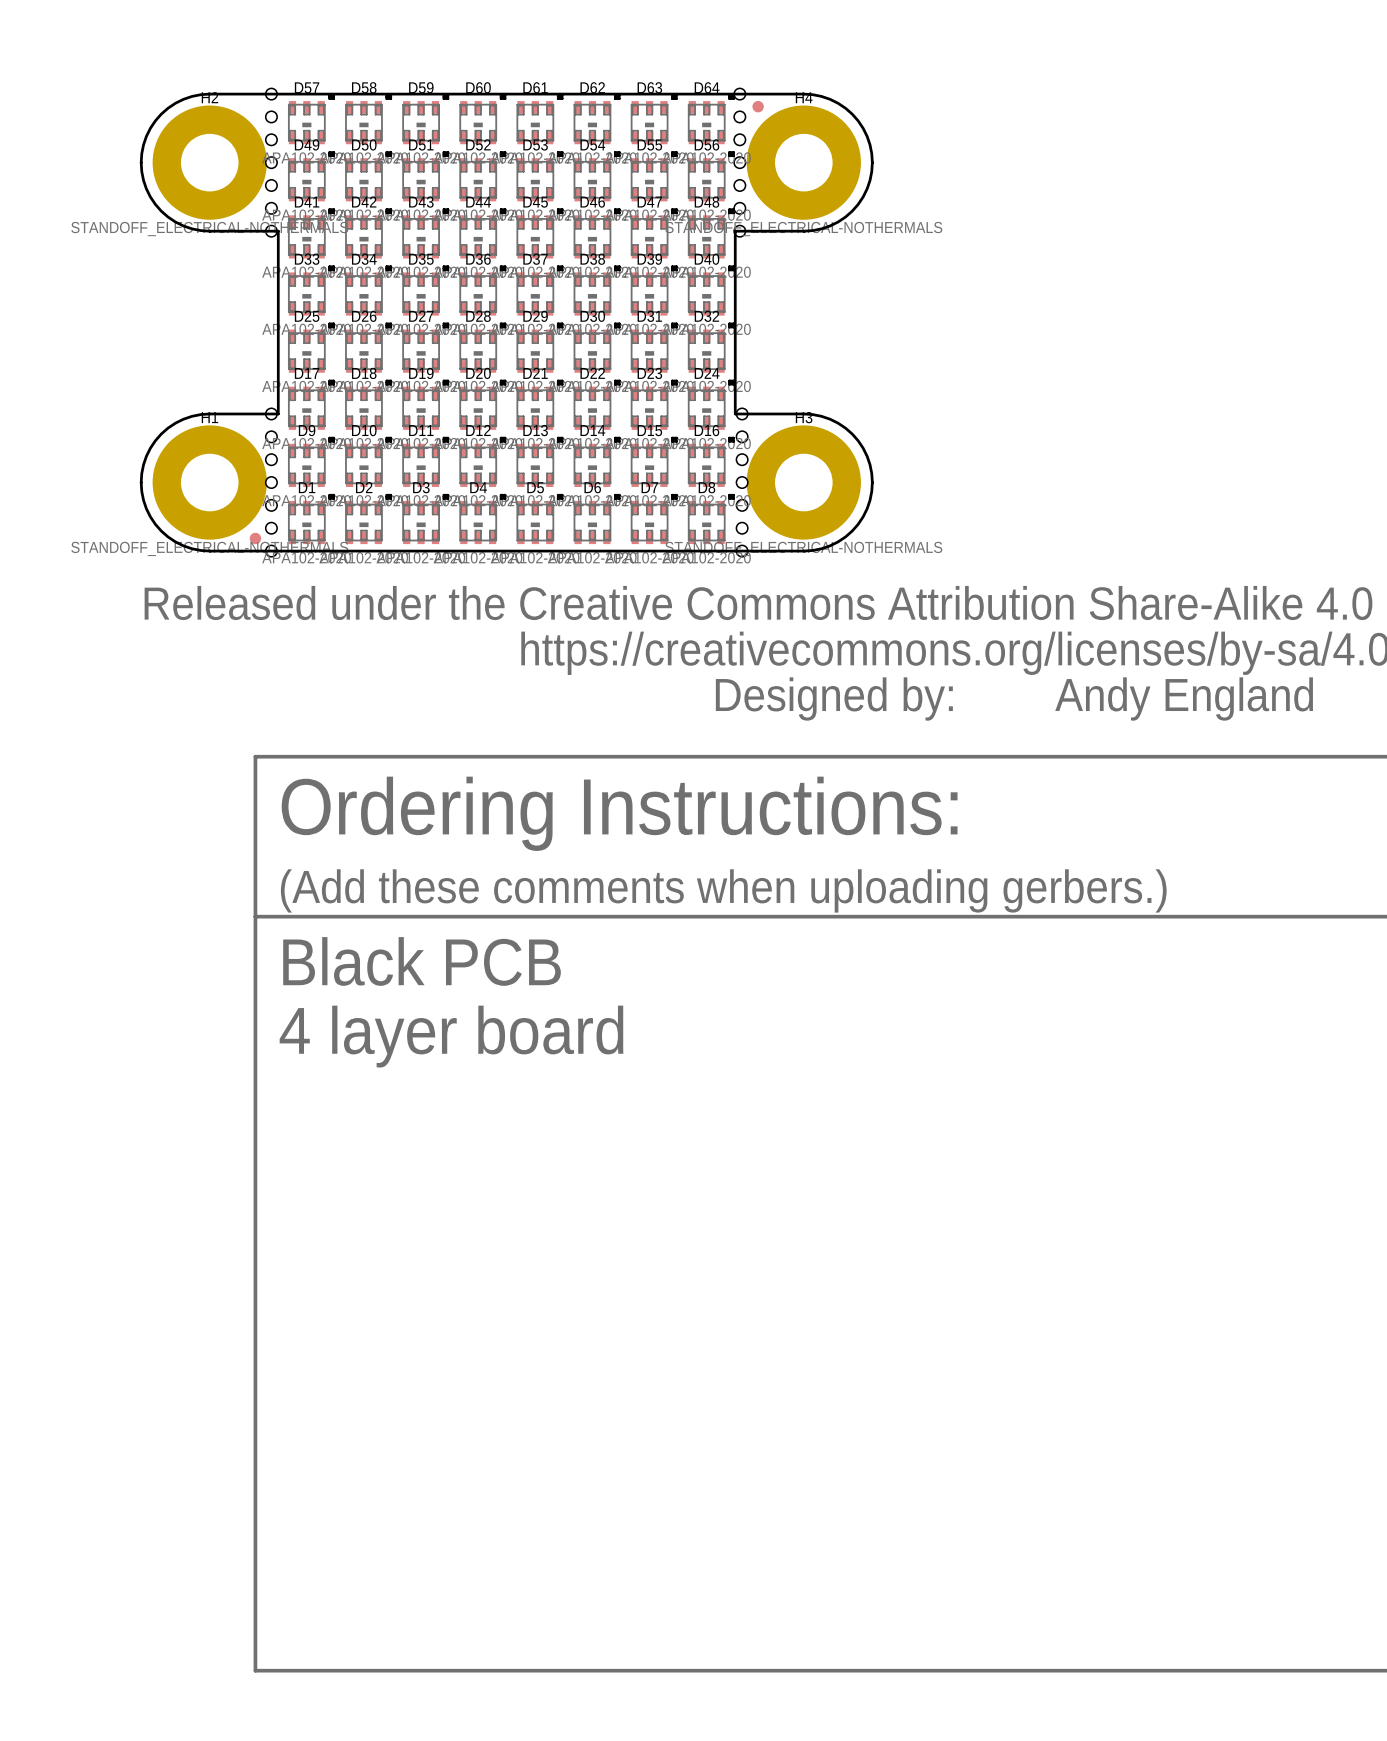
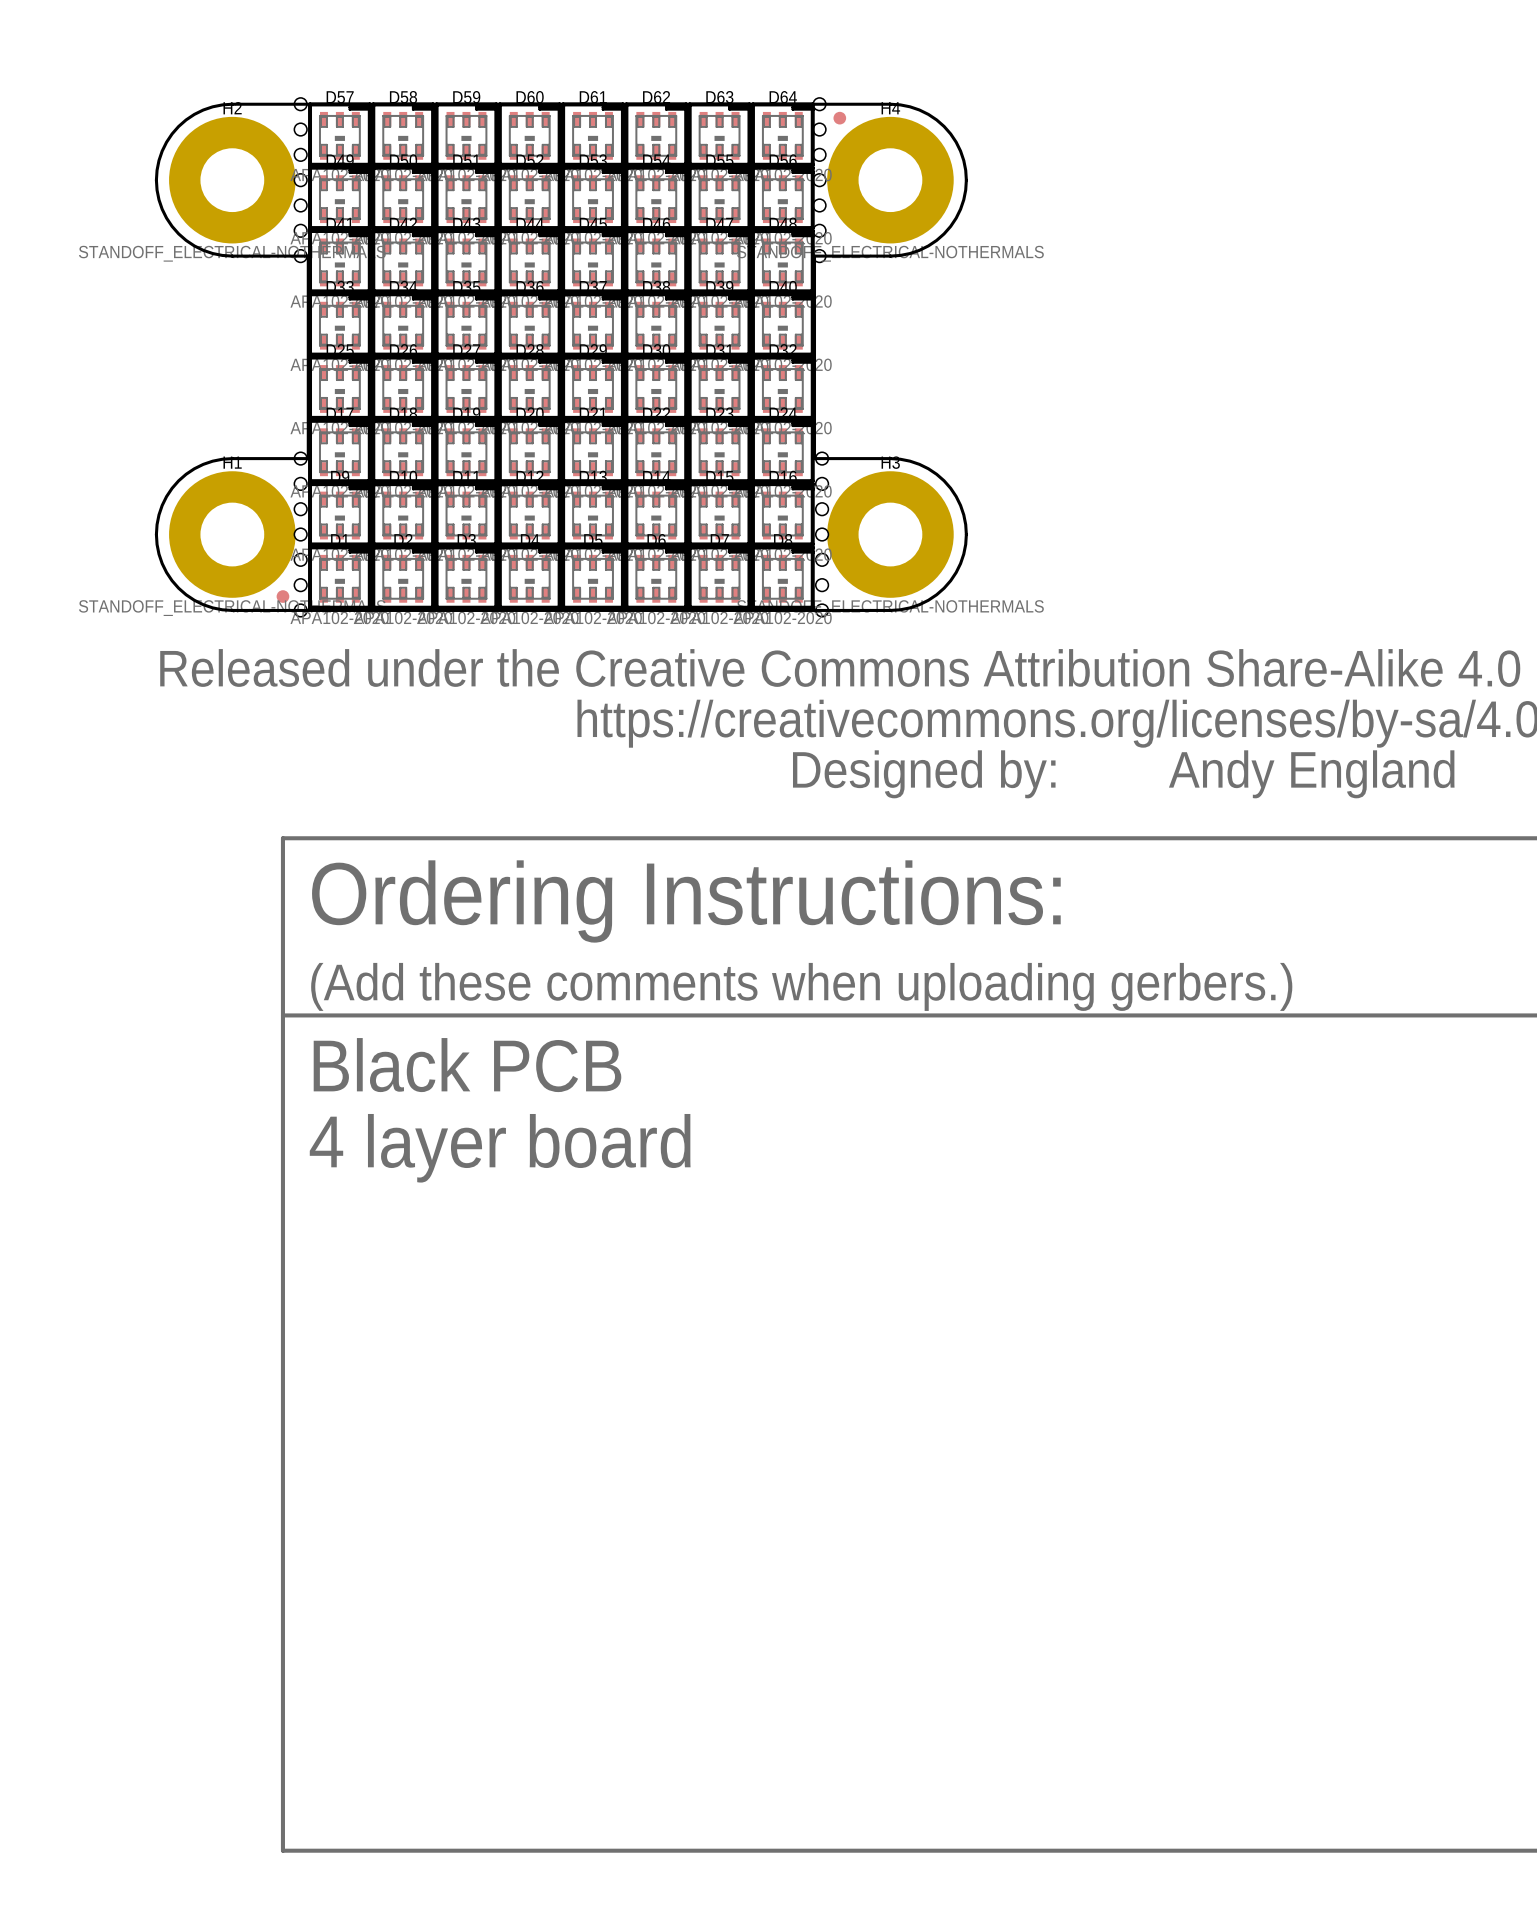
D57 footprint: [287, 94, 335, 145] -> [308, 102, 372, 167]
D58 footprint: [345, 94, 393, 145] -> [371, 102, 436, 167]
D59 footprint: [402, 94, 450, 145] -> [434, 102, 499, 167]
D60 footprint: [459, 94, 507, 145] -> [497, 102, 562, 167]
D61 footprint: [516, 94, 564, 145] -> [561, 102, 625, 167]
D62 footprint: [573, 94, 621, 145] -> [624, 102, 689, 167]
D63 footprint: [630, 94, 678, 145] -> [687, 102, 752, 167]
D64 footprint: [687, 94, 735, 145] -> [750, 102, 815, 167]
D49 footprint: [287, 151, 335, 202] -> [308, 165, 372, 231]
D50 footprint: [345, 151, 393, 202] -> [371, 165, 436, 231]
D51 footprint: [402, 151, 450, 202] -> [434, 165, 499, 231]
D52 footprint: [459, 151, 507, 202] -> [497, 165, 562, 231]
D53 footprint: [516, 151, 564, 202] -> [561, 165, 625, 231]
D54 footprint: [573, 151, 621, 202] -> [624, 165, 689, 231]
D55 footprint: [630, 151, 678, 202] -> [687, 165, 752, 231]
D56 footprint: [687, 151, 735, 202] -> [750, 165, 815, 231]
D41 footprint: [287, 208, 335, 259] -> [308, 229, 372, 294]
D42 footprint: [345, 208, 393, 259] -> [371, 229, 436, 294]
D43 footprint: [402, 208, 450, 259] -> [434, 229, 499, 294]
D44 footprint: [459, 208, 507, 259] -> [497, 229, 562, 294]
D45 footprint: [516, 208, 564, 259] -> [561, 229, 625, 294]
D46 footprint: [573, 208, 621, 259] -> [624, 229, 689, 294]
D47 footprint: [630, 208, 678, 259] -> [687, 229, 752, 294]
D48 footprint: [687, 208, 735, 259] -> [750, 229, 815, 294]
D33 footprint: [287, 265, 335, 316] -> [308, 292, 372, 357]
D34 footprint: [345, 265, 393, 316] -> [371, 292, 436, 357]
D35 footprint: [402, 265, 450, 316] -> [434, 292, 499, 357]
D36 footprint: [459, 265, 507, 316] -> [497, 292, 562, 357]
D37 footprint: [516, 265, 564, 316] -> [561, 292, 625, 357]
D38 footprint: [573, 265, 621, 316] -> [624, 292, 689, 357]
D39 footprint: [630, 265, 678, 316] -> [687, 292, 752, 357]
D40 footprint: [687, 265, 735, 316] -> [750, 292, 815, 357]
D25 footprint: [287, 322, 335, 373] -> [308, 355, 372, 420]
D26 footprint: [345, 322, 393, 373] -> [371, 355, 436, 420]
D27 footprint: [402, 322, 450, 373] -> [434, 355, 499, 420]
D28 footprint: [459, 322, 507, 373] -> [497, 355, 562, 420]
D29 footprint: [516, 322, 564, 373] -> [561, 355, 625, 420]
D30 footprint: [573, 322, 621, 373] -> [624, 355, 689, 420]
D31 footprint: [630, 322, 678, 373] -> [687, 355, 752, 420]
D32 footprint: [687, 322, 735, 373] -> [750, 355, 815, 420]
D17 footprint: [287, 379, 335, 430] -> [308, 418, 372, 484]
D18 footprint: [345, 379, 393, 430] -> [371, 418, 436, 484]
D19 footprint: [402, 379, 450, 430] -> [434, 418, 499, 484]
D20 footprint: [459, 379, 507, 430] -> [497, 418, 562, 484]
D21 footprint: [516, 379, 564, 430] -> [561, 418, 625, 484]
D22 footprint: [573, 379, 621, 430] -> [624, 418, 689, 484]
D23 footprint: [630, 379, 678, 430] -> [687, 418, 752, 484]
D24 footprint: [687, 379, 735, 430] -> [750, 418, 815, 484]
D9 footprint: [287, 436, 335, 487] -> [308, 482, 372, 547]
D10 footprint: [345, 436, 393, 487] -> [371, 482, 436, 547]
D11 footprint: [402, 436, 450, 487] -> [434, 482, 499, 547]
D12 footprint: [459, 436, 507, 487] -> [497, 482, 562, 547]
D13 footprint: [516, 436, 564, 487] -> [561, 482, 625, 547]
D14 footprint: [573, 436, 621, 487] -> [624, 482, 689, 547]
D15 footprint: [630, 436, 678, 487] -> [687, 482, 752, 547]
D16 footprint: [687, 436, 735, 487] -> [750, 482, 815, 547]
D1 footprint: [287, 493, 335, 545] -> [308, 545, 372, 610]
D2 footprint: [345, 493, 393, 545] -> [371, 545, 436, 610]
D3 footprint: [402, 493, 450, 545] -> [434, 545, 499, 610]
D4 footprint: [459, 493, 507, 545] -> [497, 545, 562, 610]
D5 footprint: [516, 493, 564, 545] -> [561, 545, 625, 610]
D6 footprint: [573, 493, 621, 545] -> [624, 545, 689, 610]
D7 footprint: [630, 493, 678, 545] -> [687, 545, 752, 610]
D8 footprint: [687, 493, 735, 545] -> [750, 545, 815, 610]

